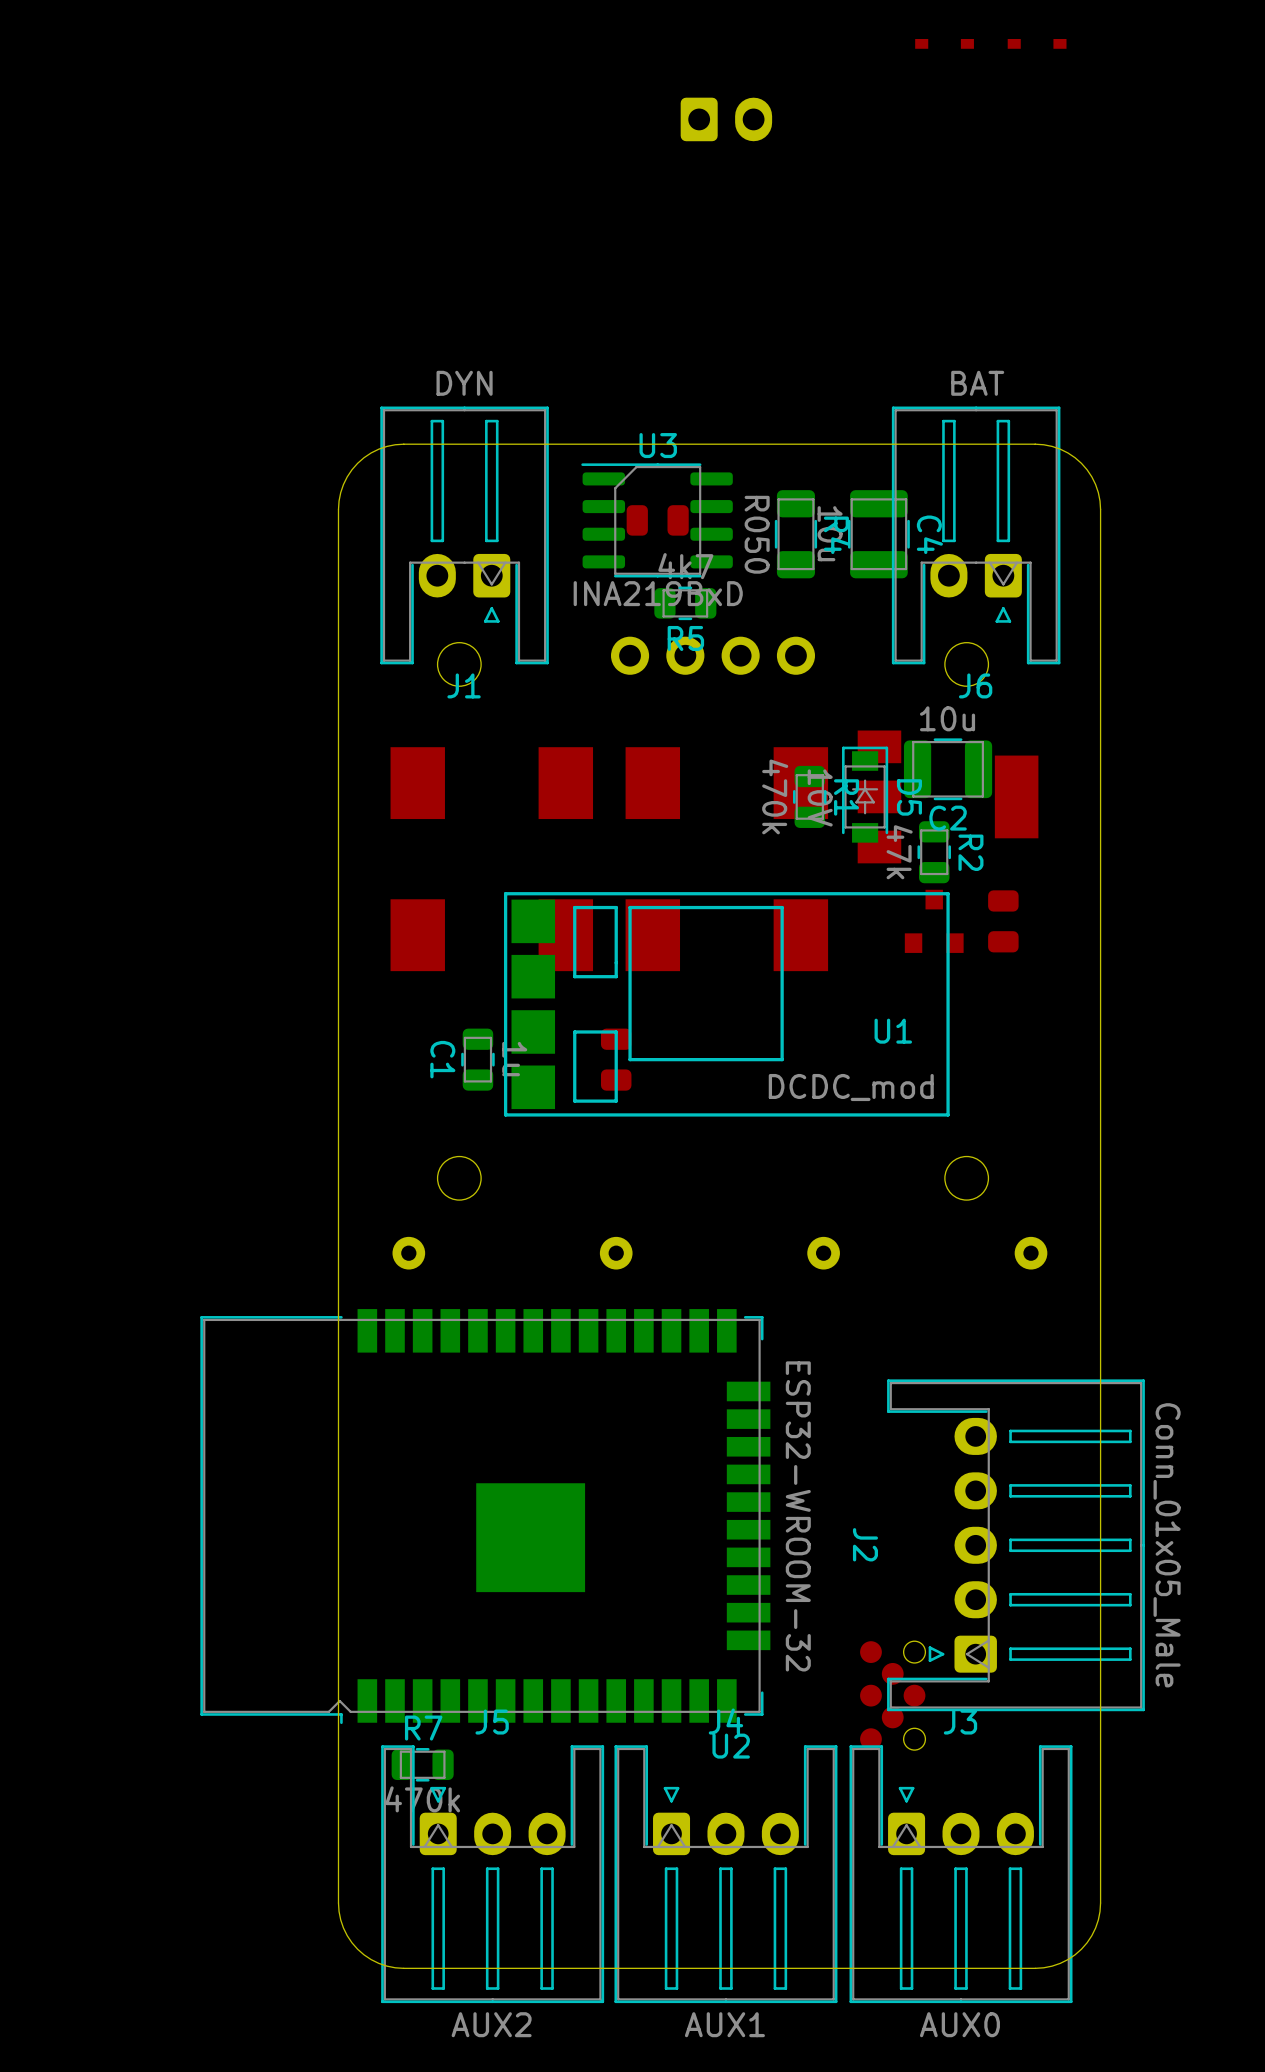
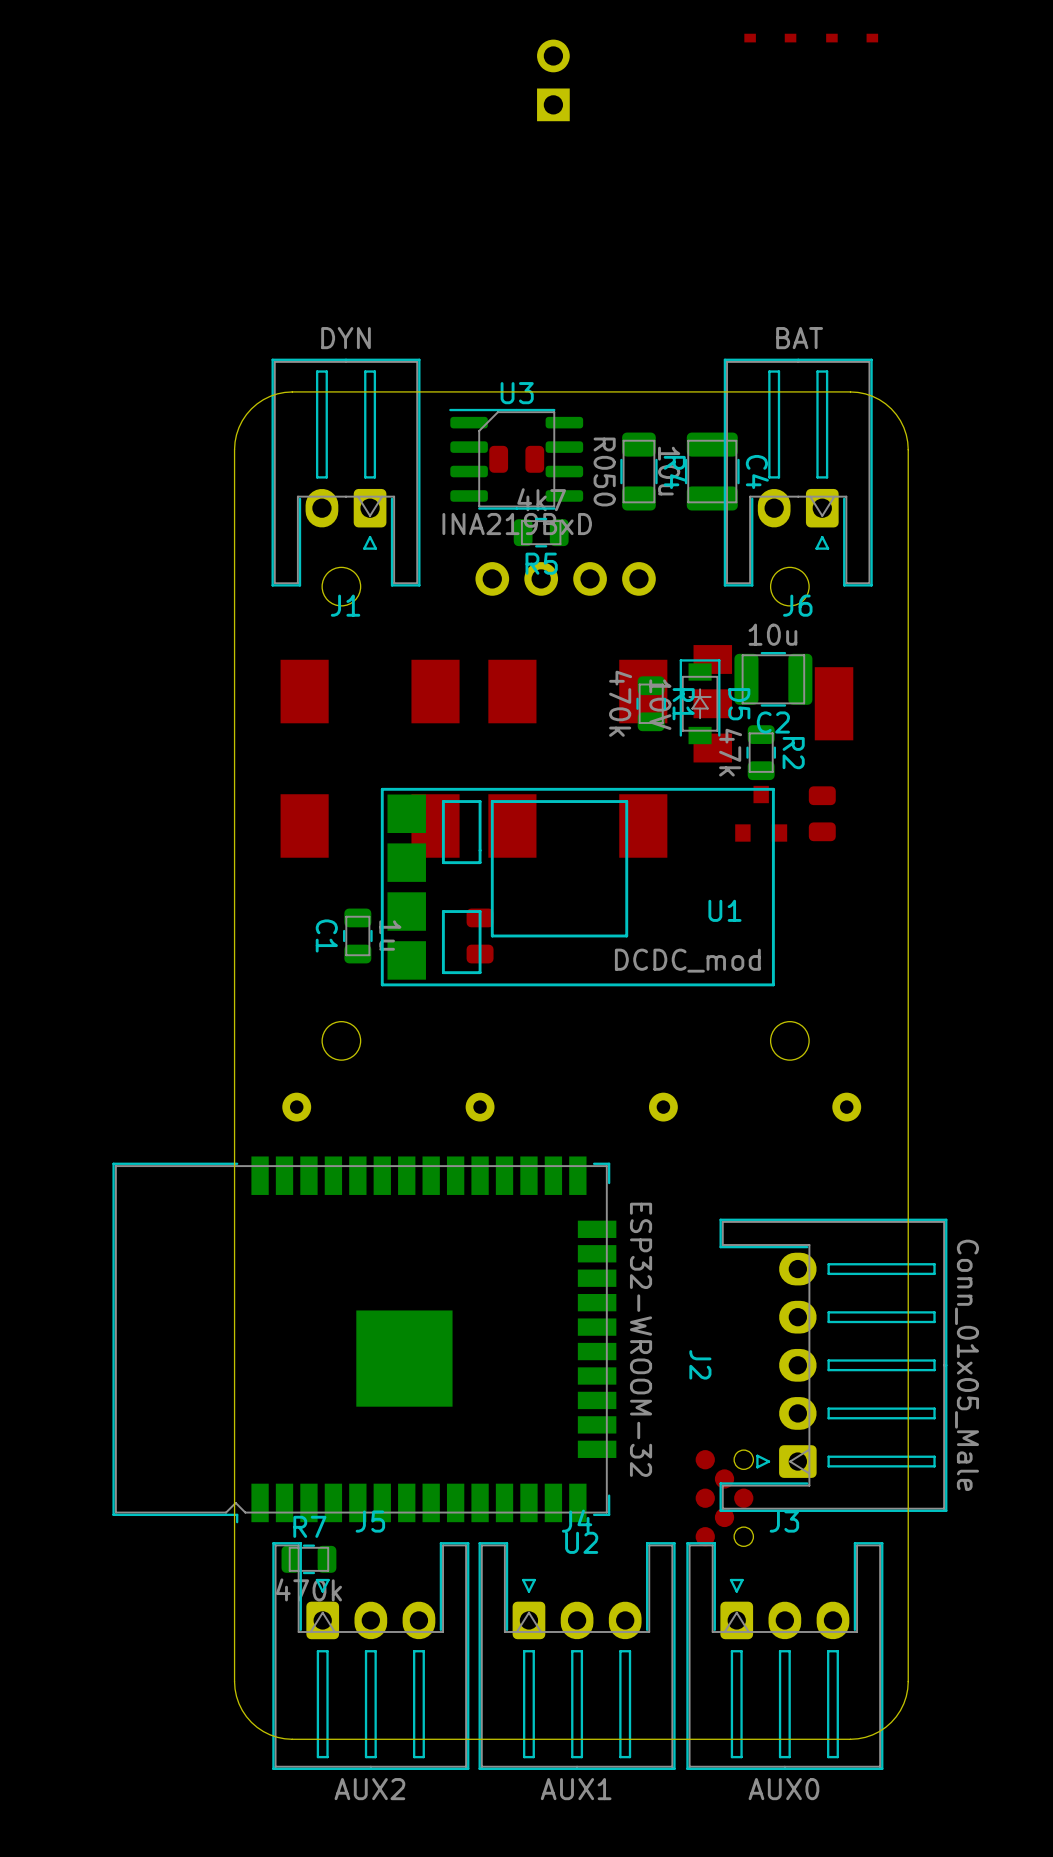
part: none -> (553, 80)
part: (726, 119) -> none

